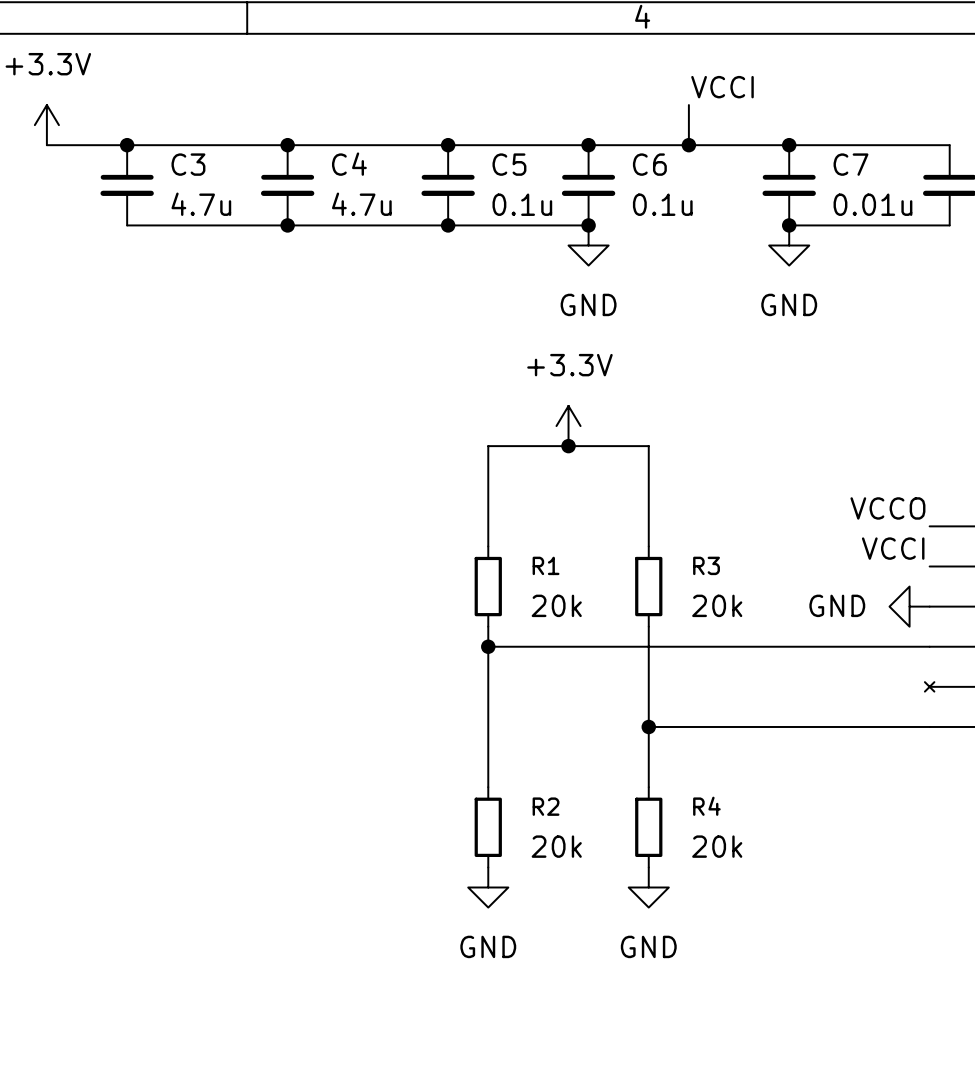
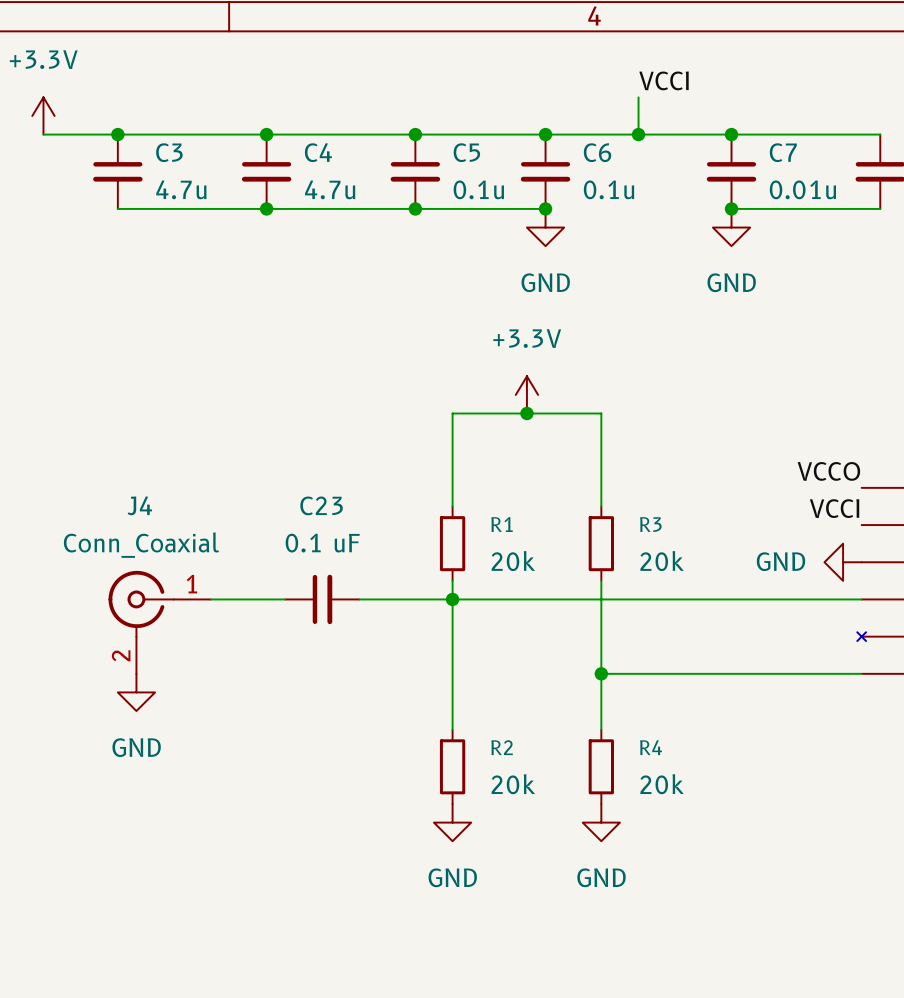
wire: none -> (210, 599) (285, 599)
C23: none -> 0.1 uF (322, 599)
wire: none -> (359, 599) (452, 599)
J4: none -> Conn_Coaxial (159, 622)
power symbol: none -> GND (136, 692)

